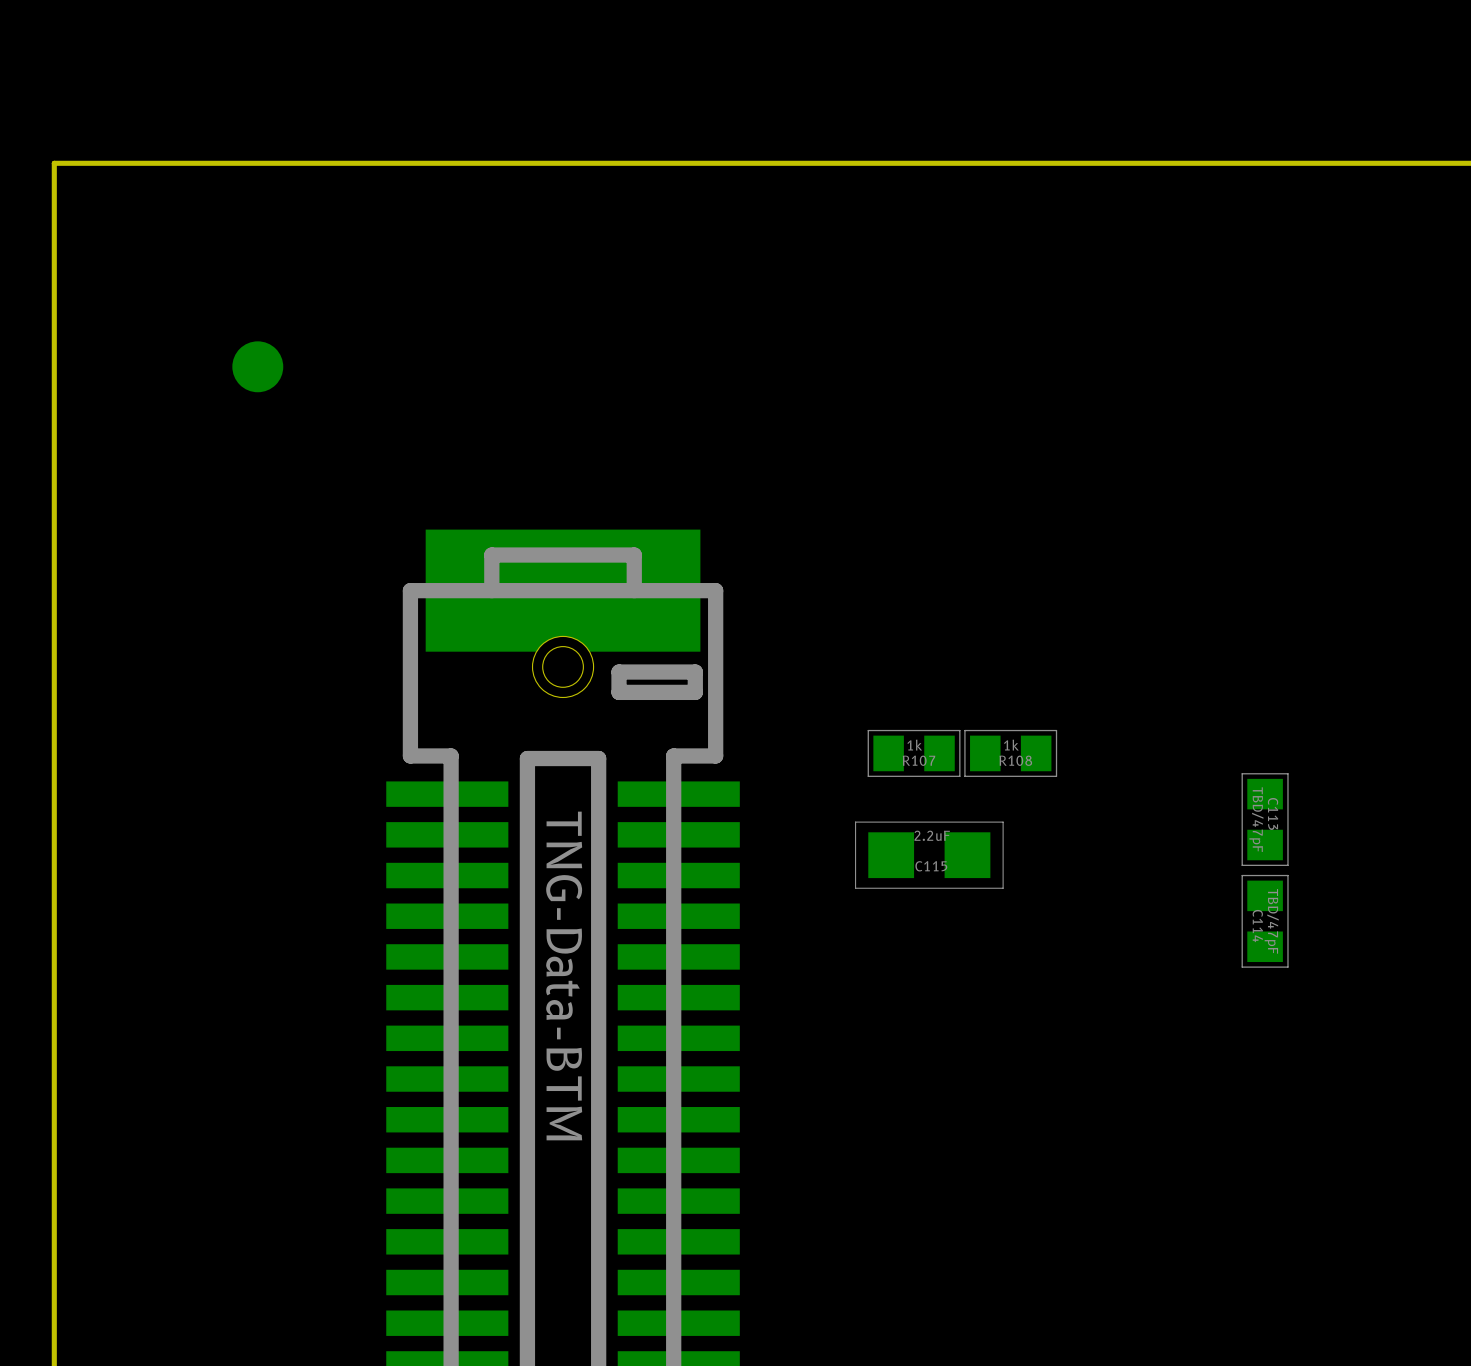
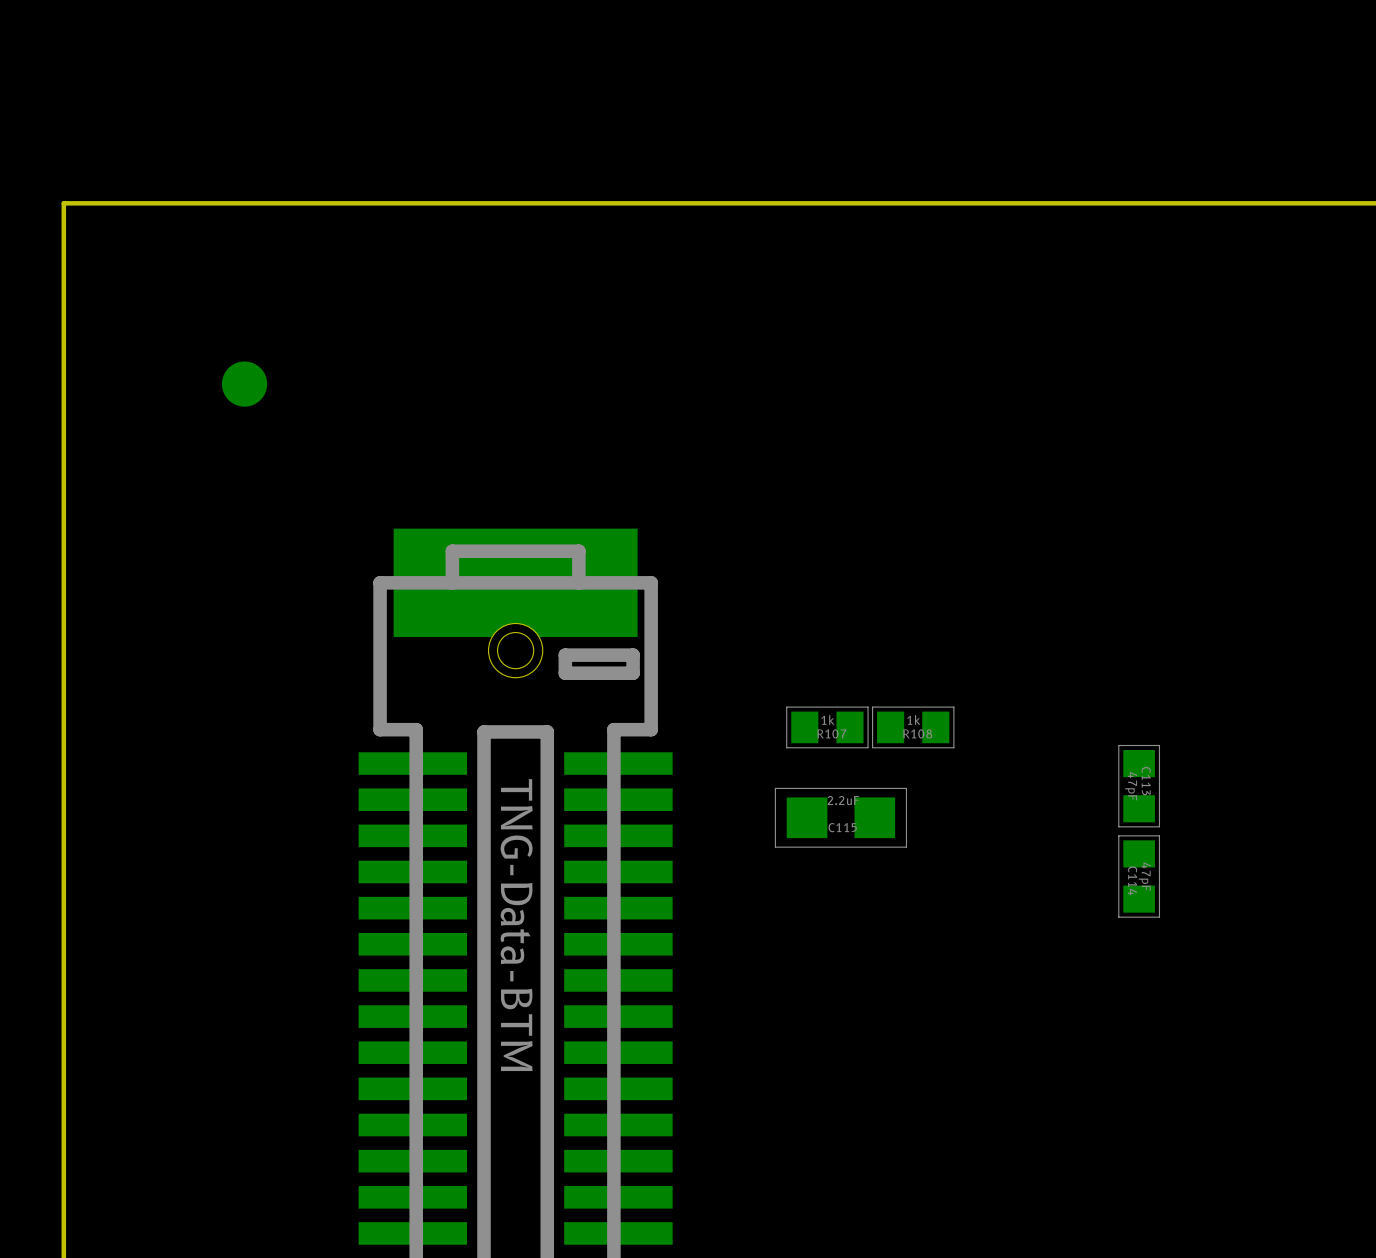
C113 value: TBD/47pF (1256, 819) -> 47pF (1131, 786)
C114 value: TBD/47pF (1271, 921) -> 47pF (1144, 876)

